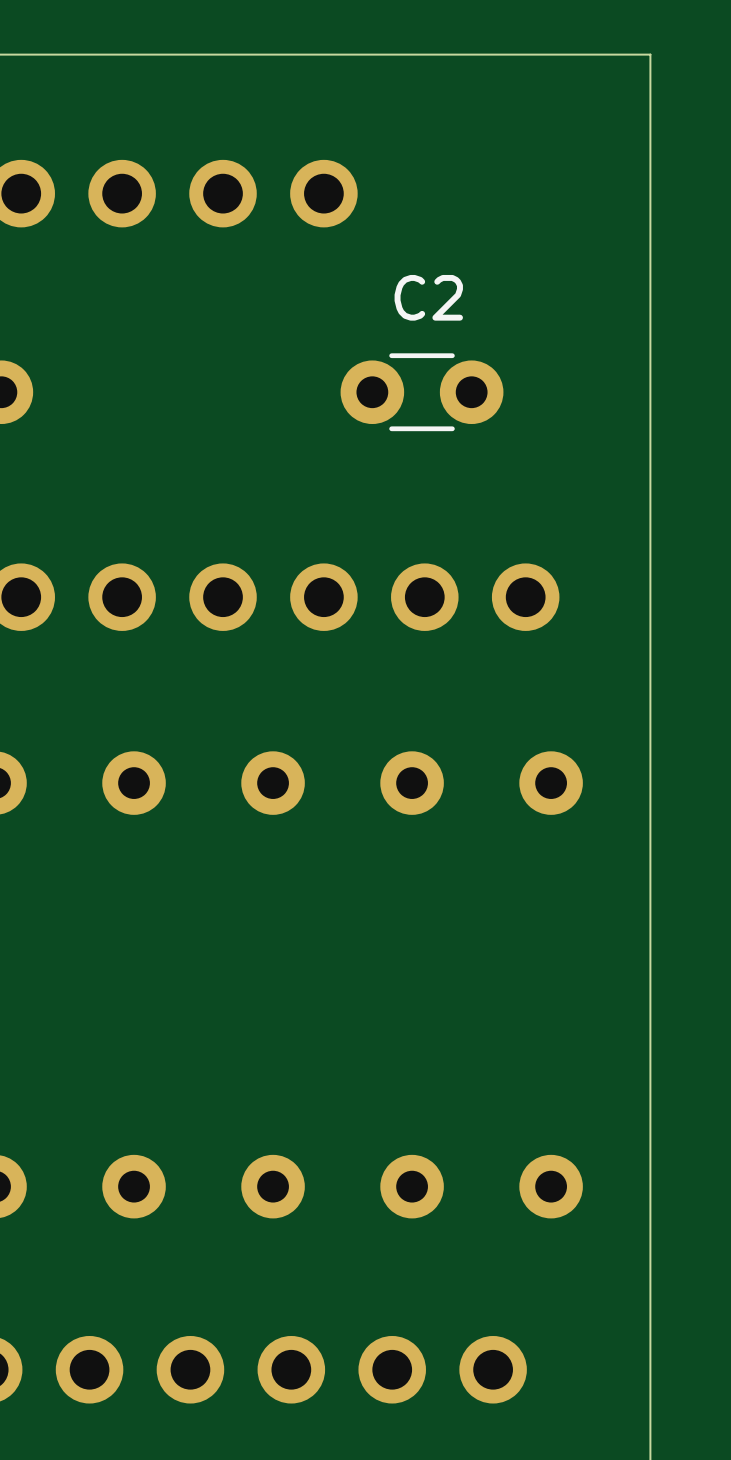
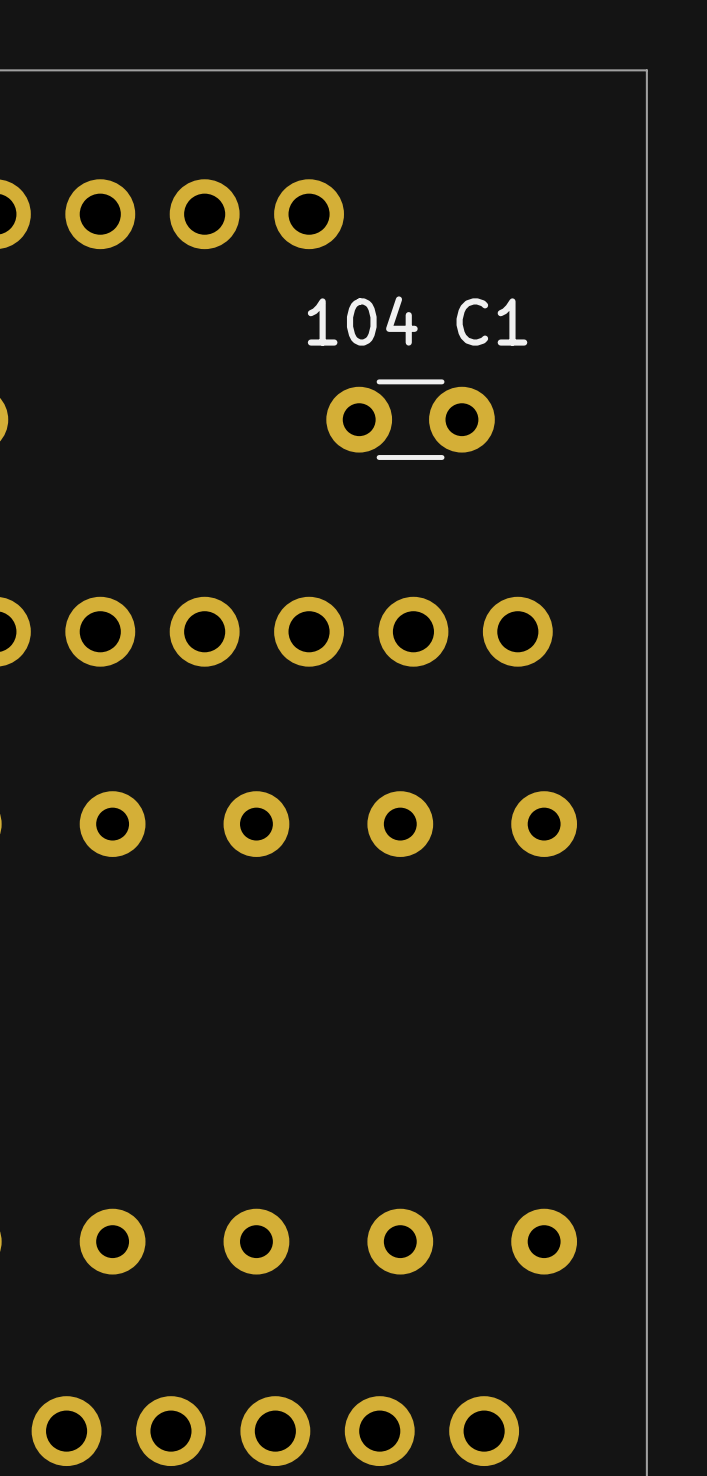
C2 name: C2 (428, 297) -> 104 C1 (417, 321)

